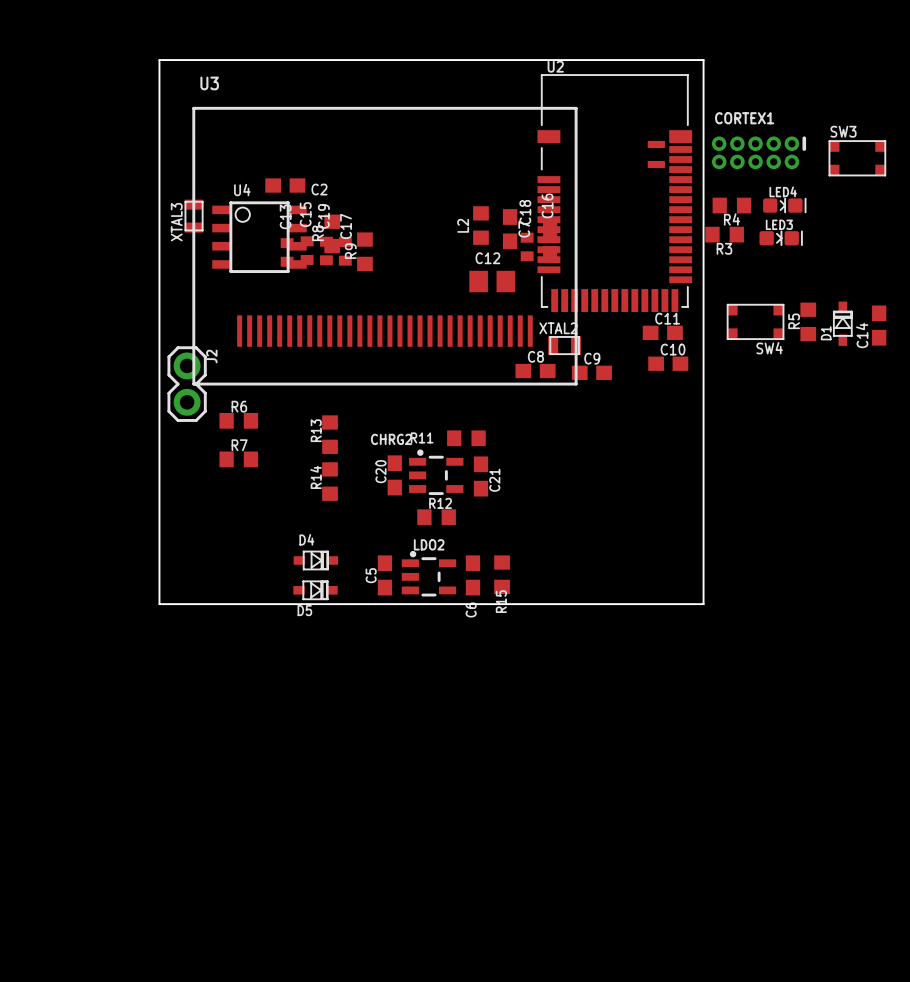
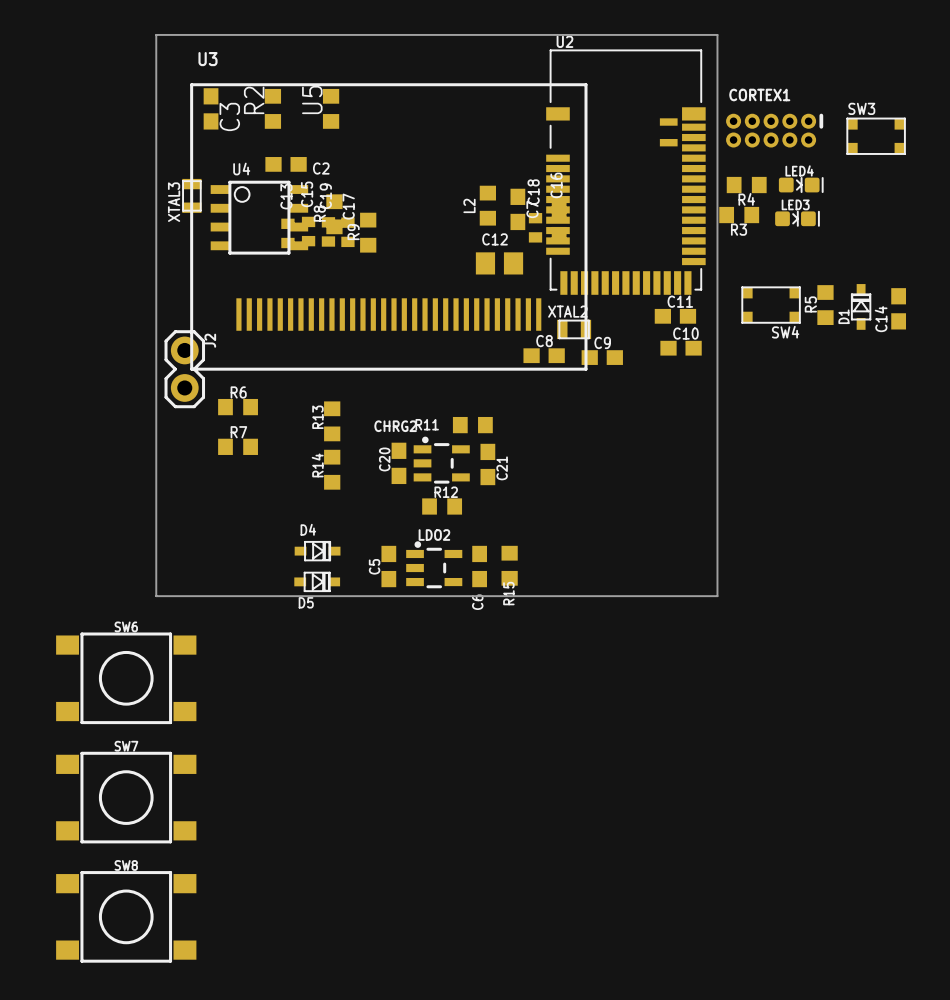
C3: none -> (211, 108)
R2: none -> (272, 108)
U5: none -> (331, 108)
SW6: none -> (126, 678)
SW7: none -> (126, 797)
SW8: none -> (126, 916)

